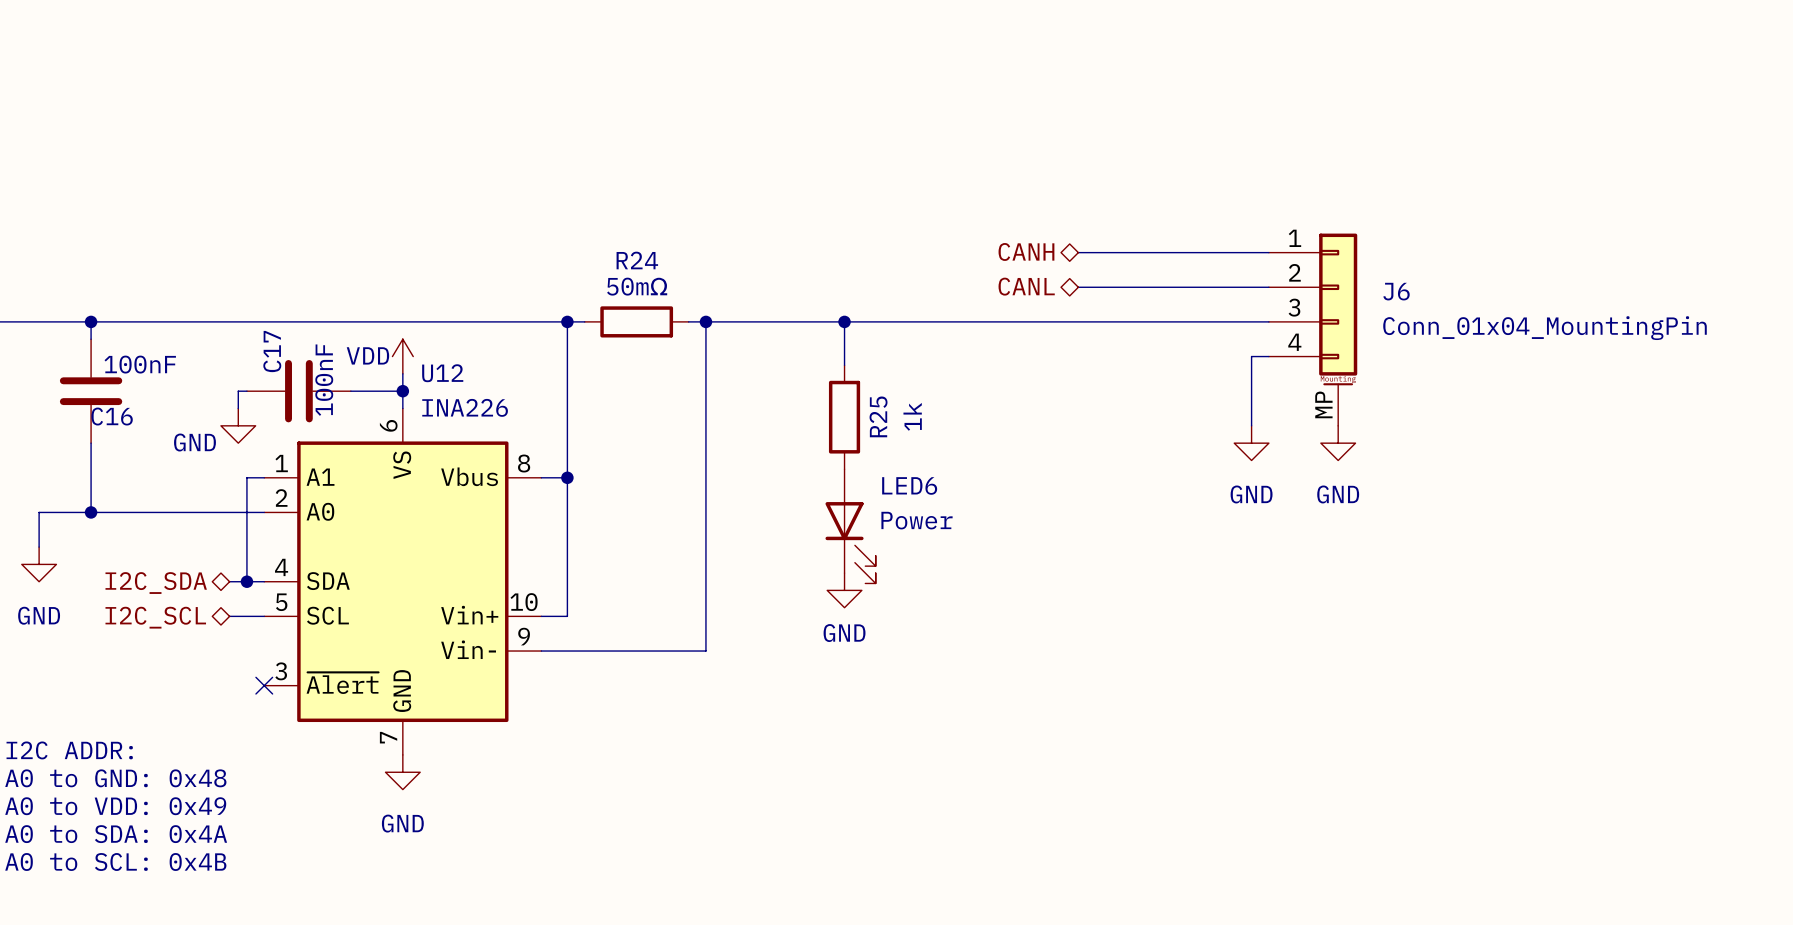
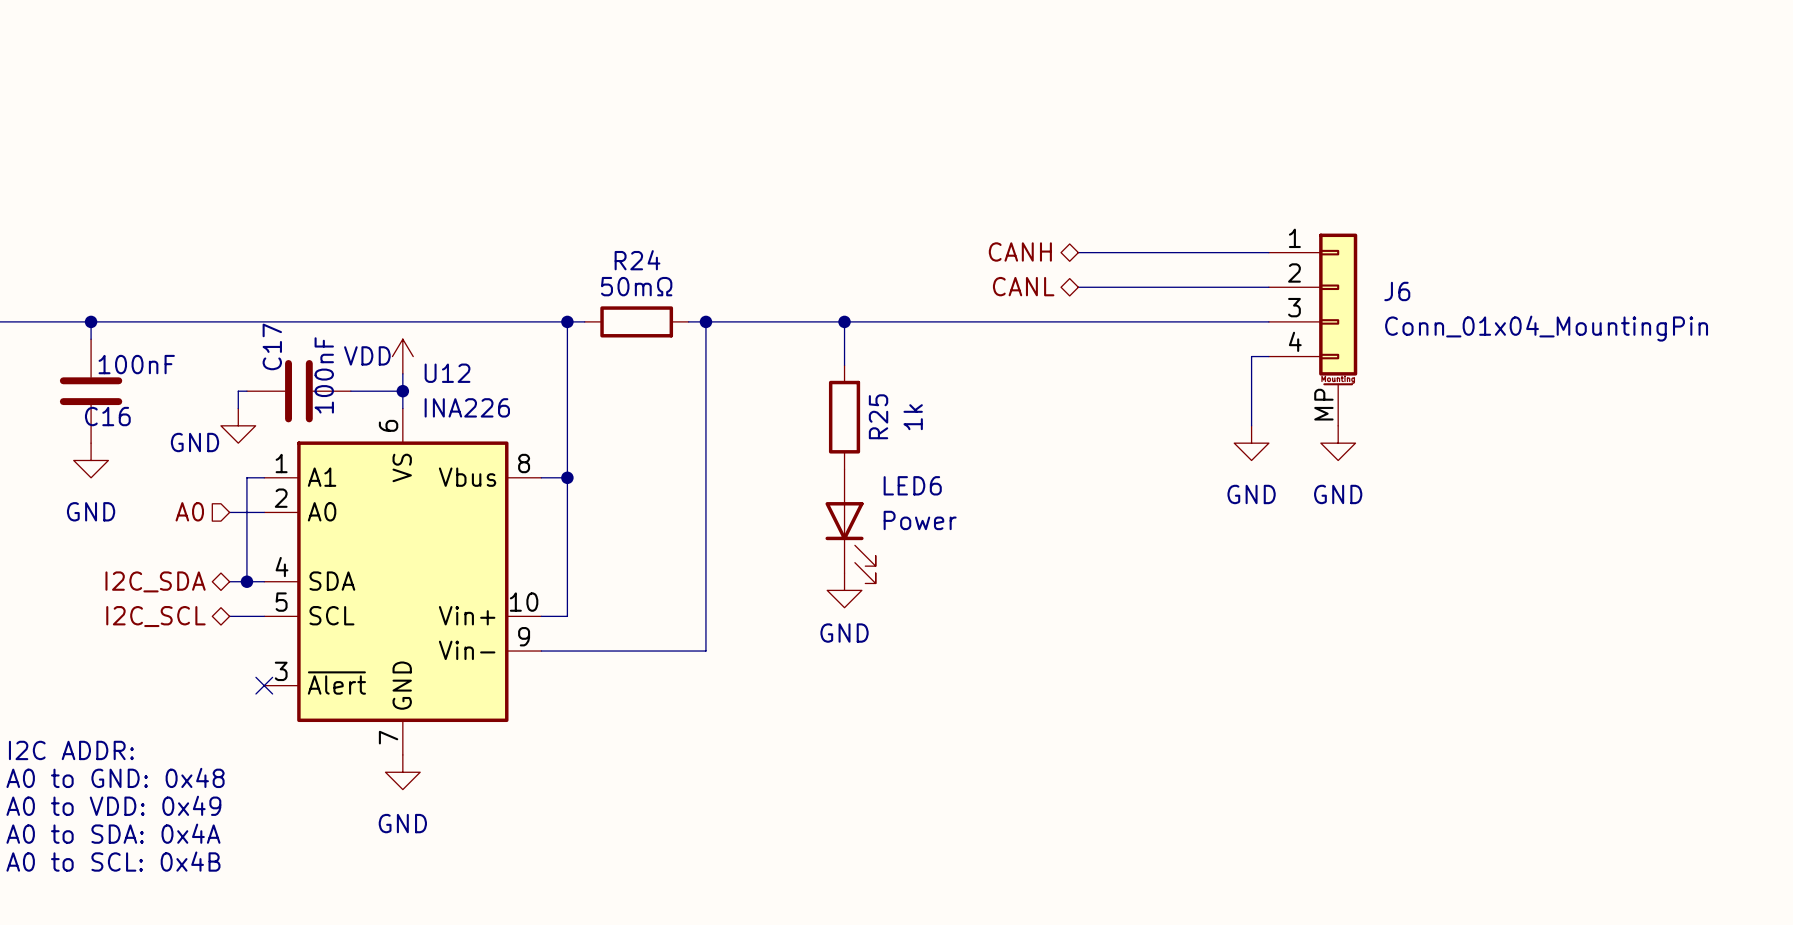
wire: (91, 443) (91, 512) -> none
hierarchical label: none -> A0 (189, 511)
junction: (91, 512) -> none
wire: (229, 512) (39, 512) (39, 547) -> none
power symbol position: GND (39, 564) -> GND (91, 460)

